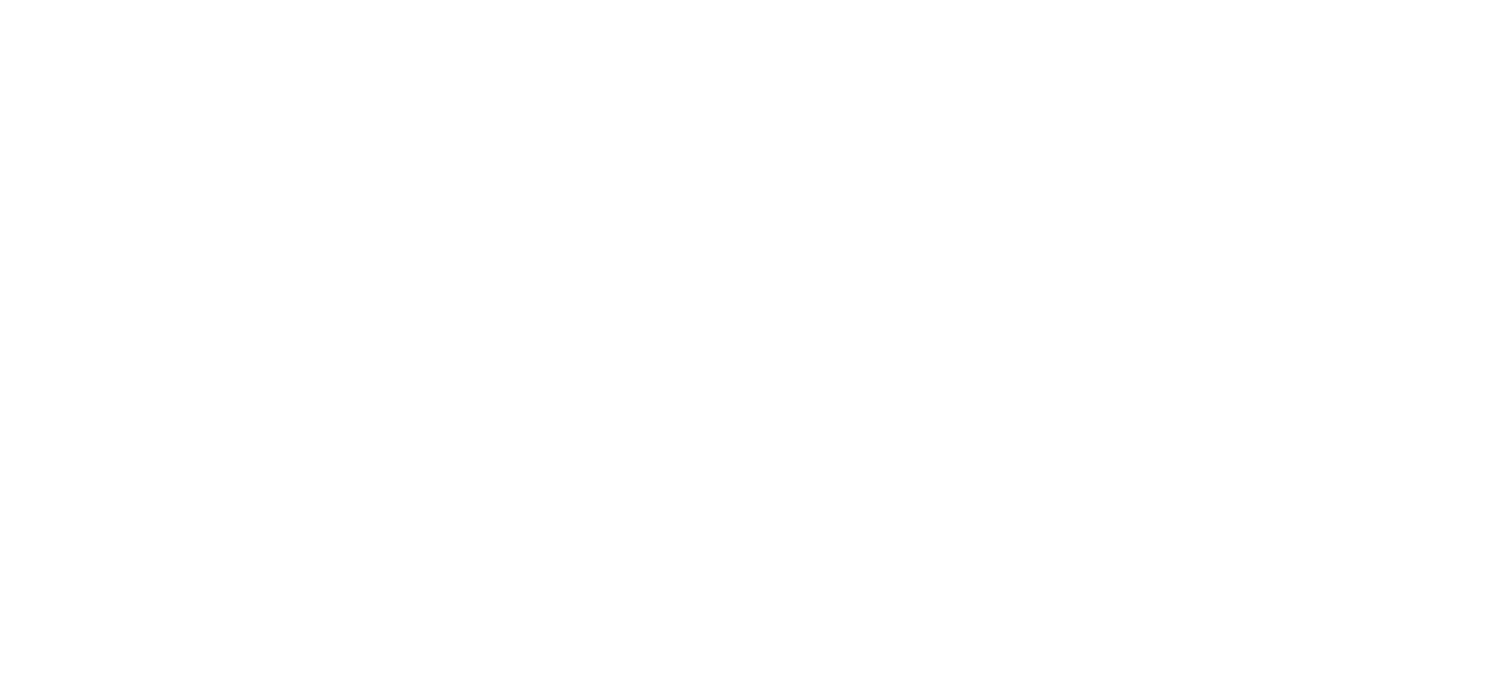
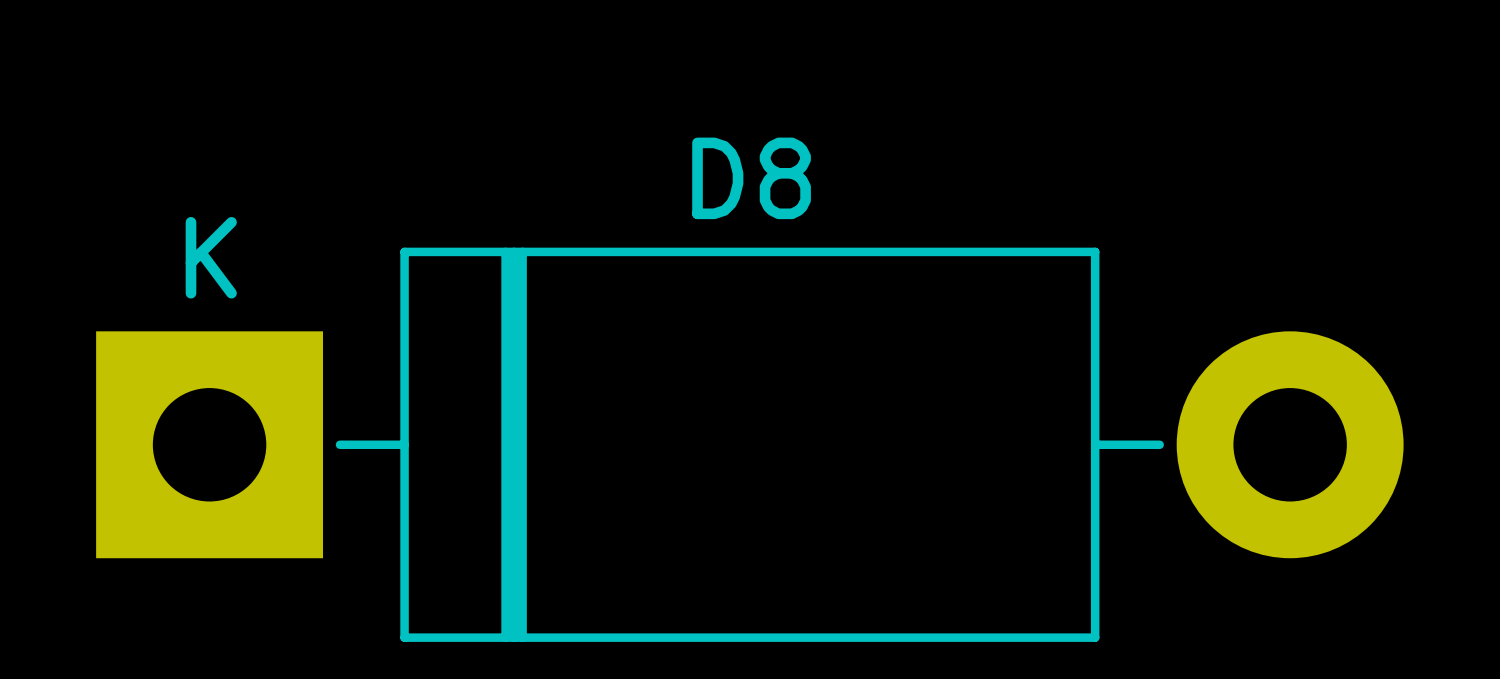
D8: none -> (749, 444)

